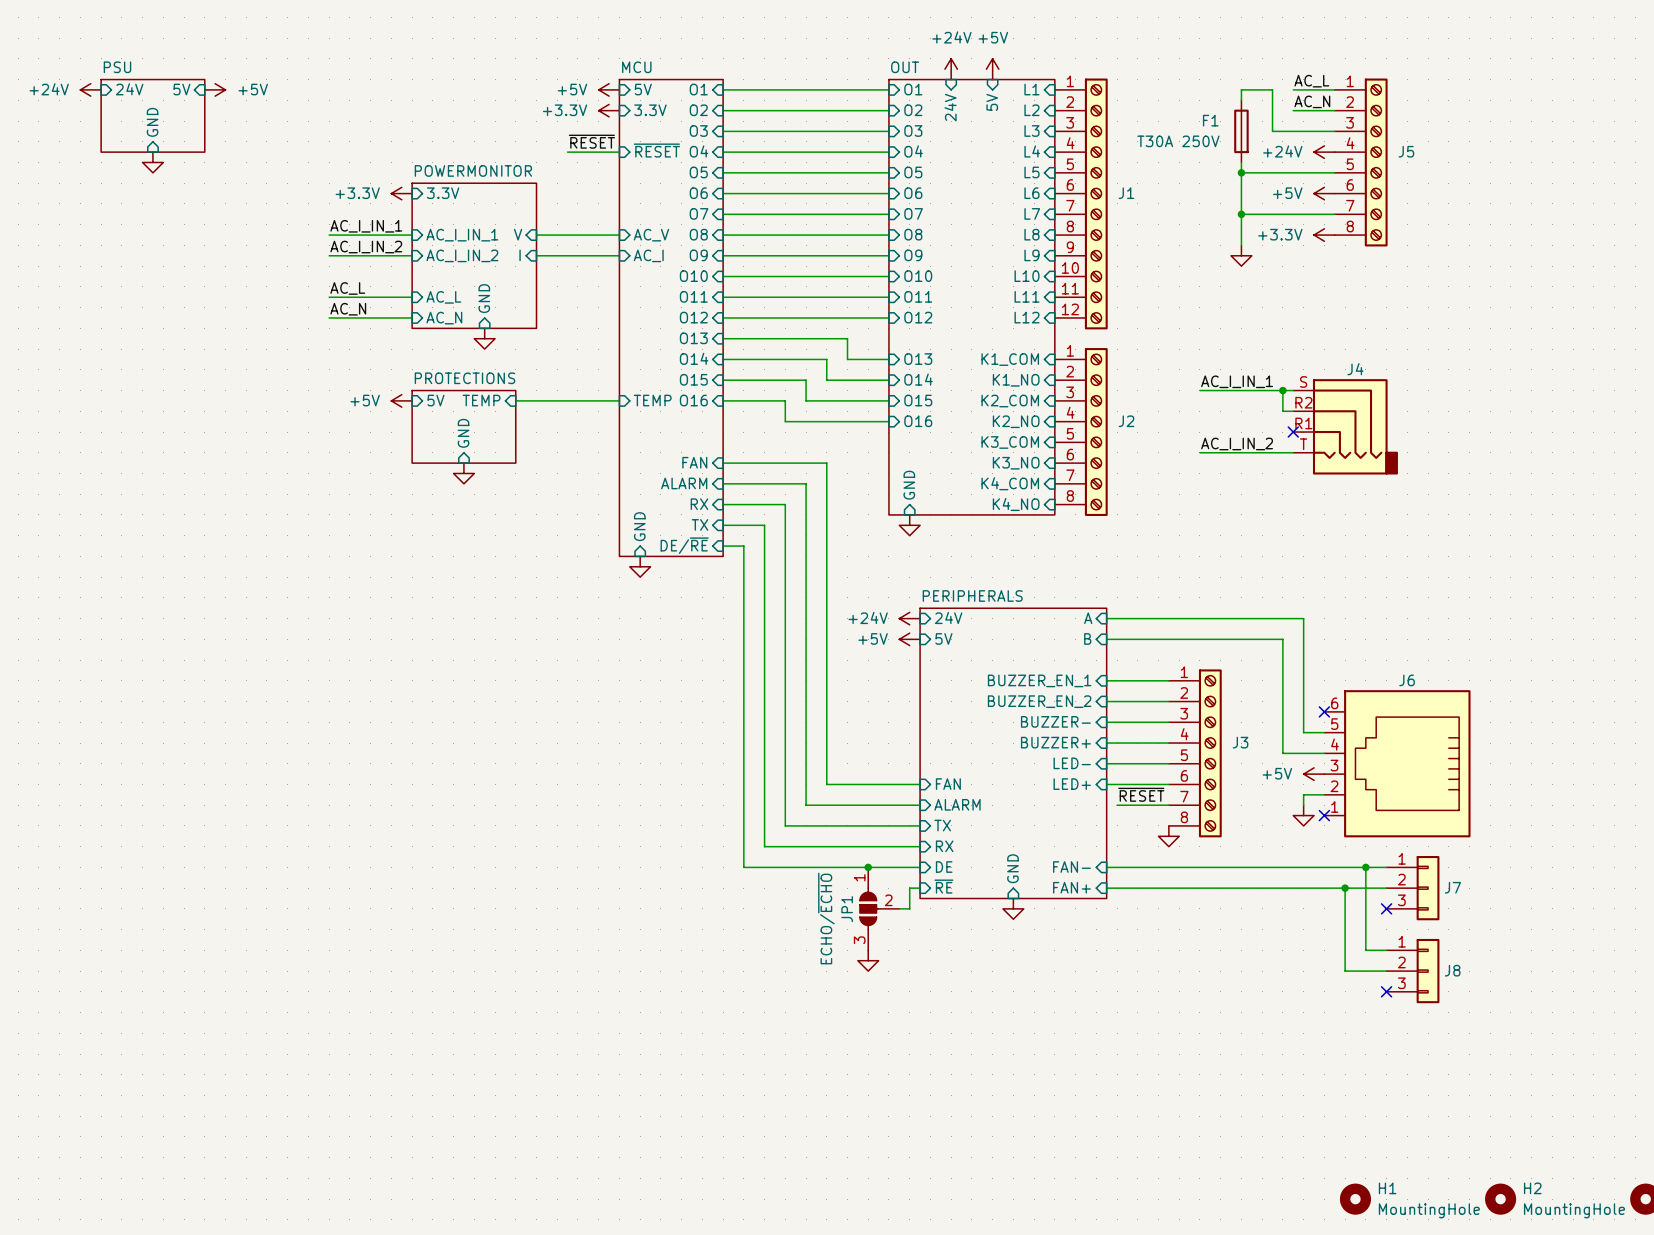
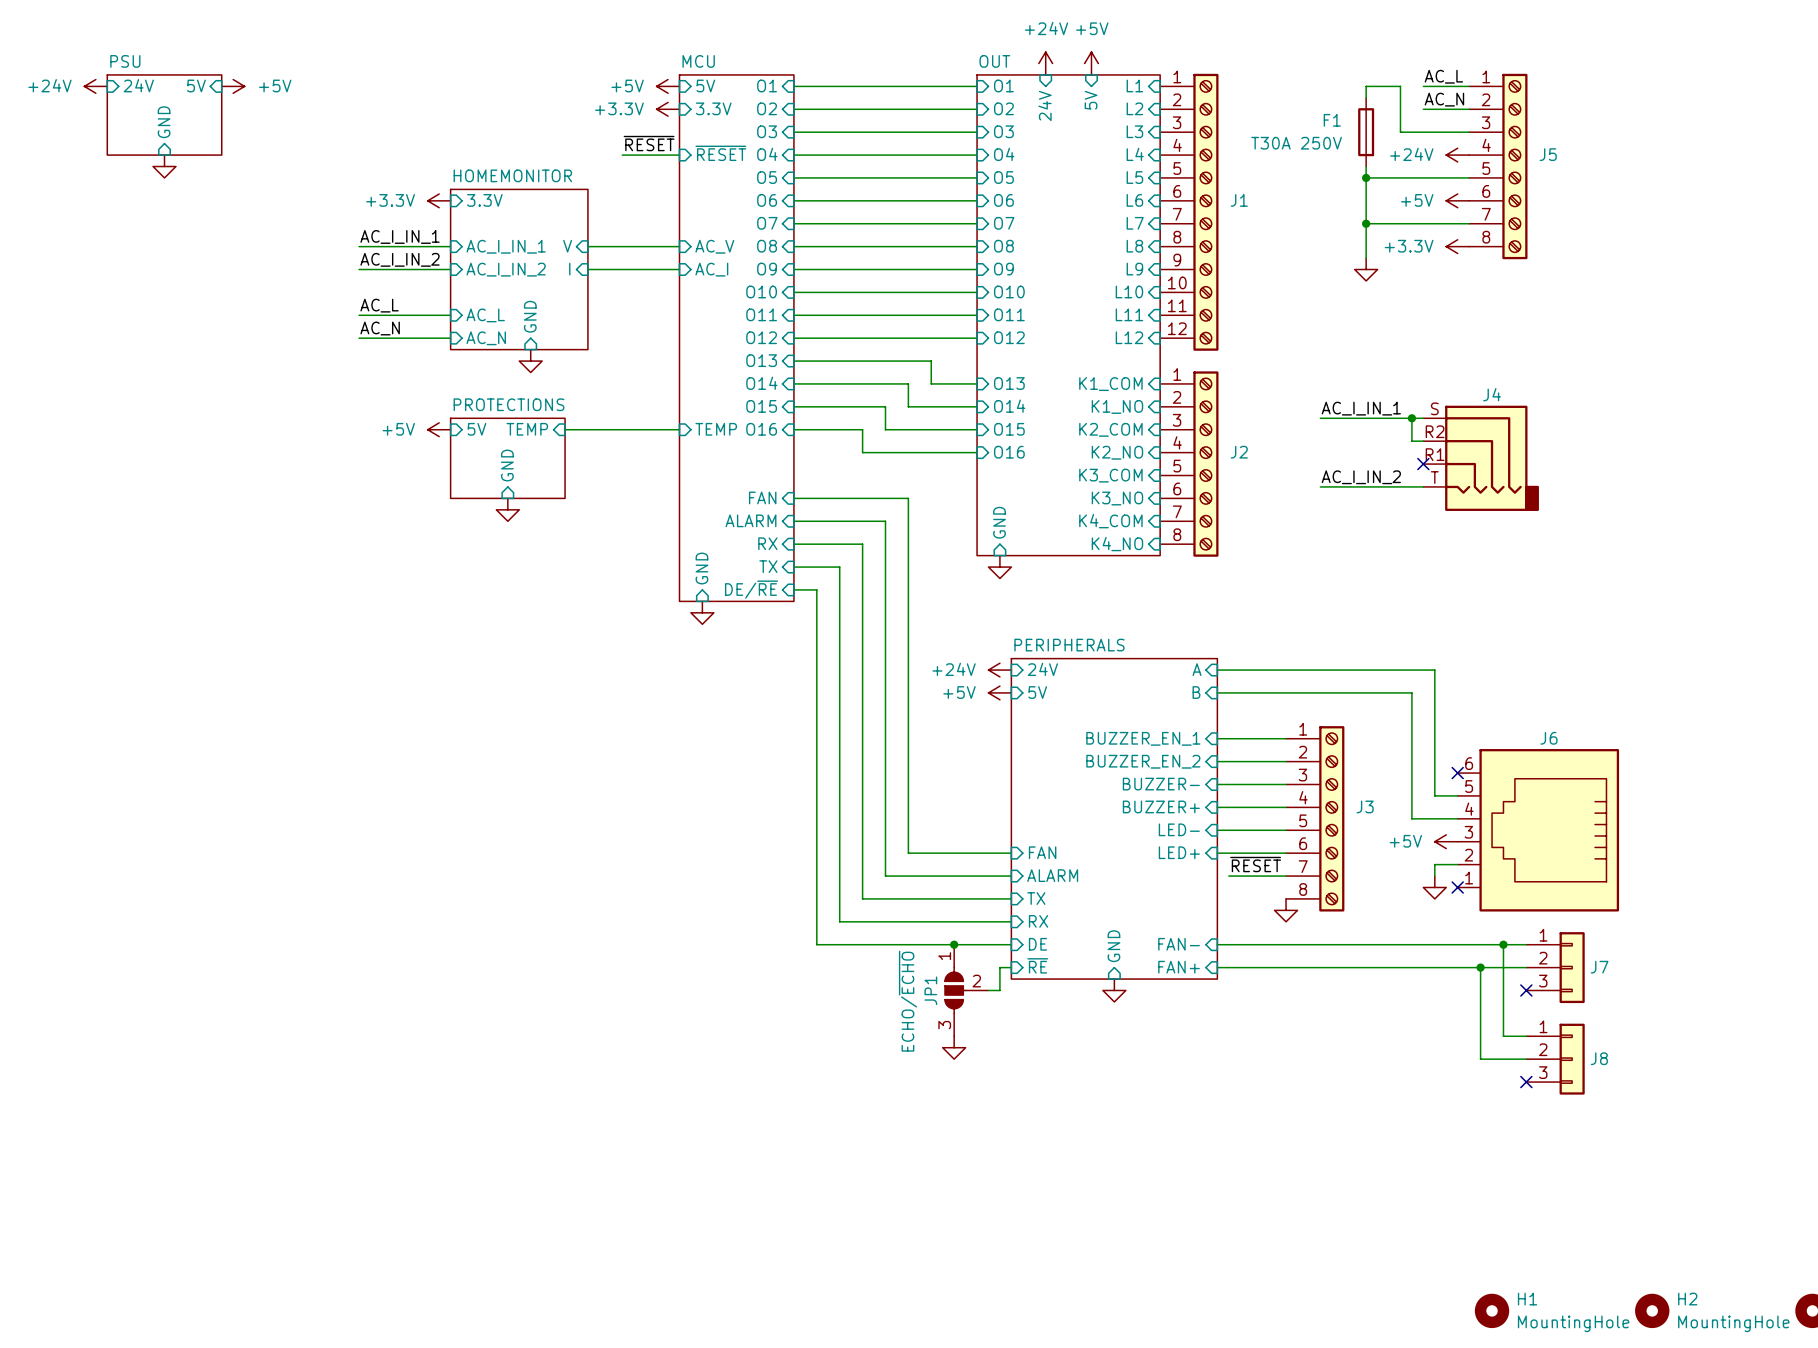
sheet POWERMONITOR name: POWERMONITOR (473, 170) -> HOMEMONITOR (512, 175)

